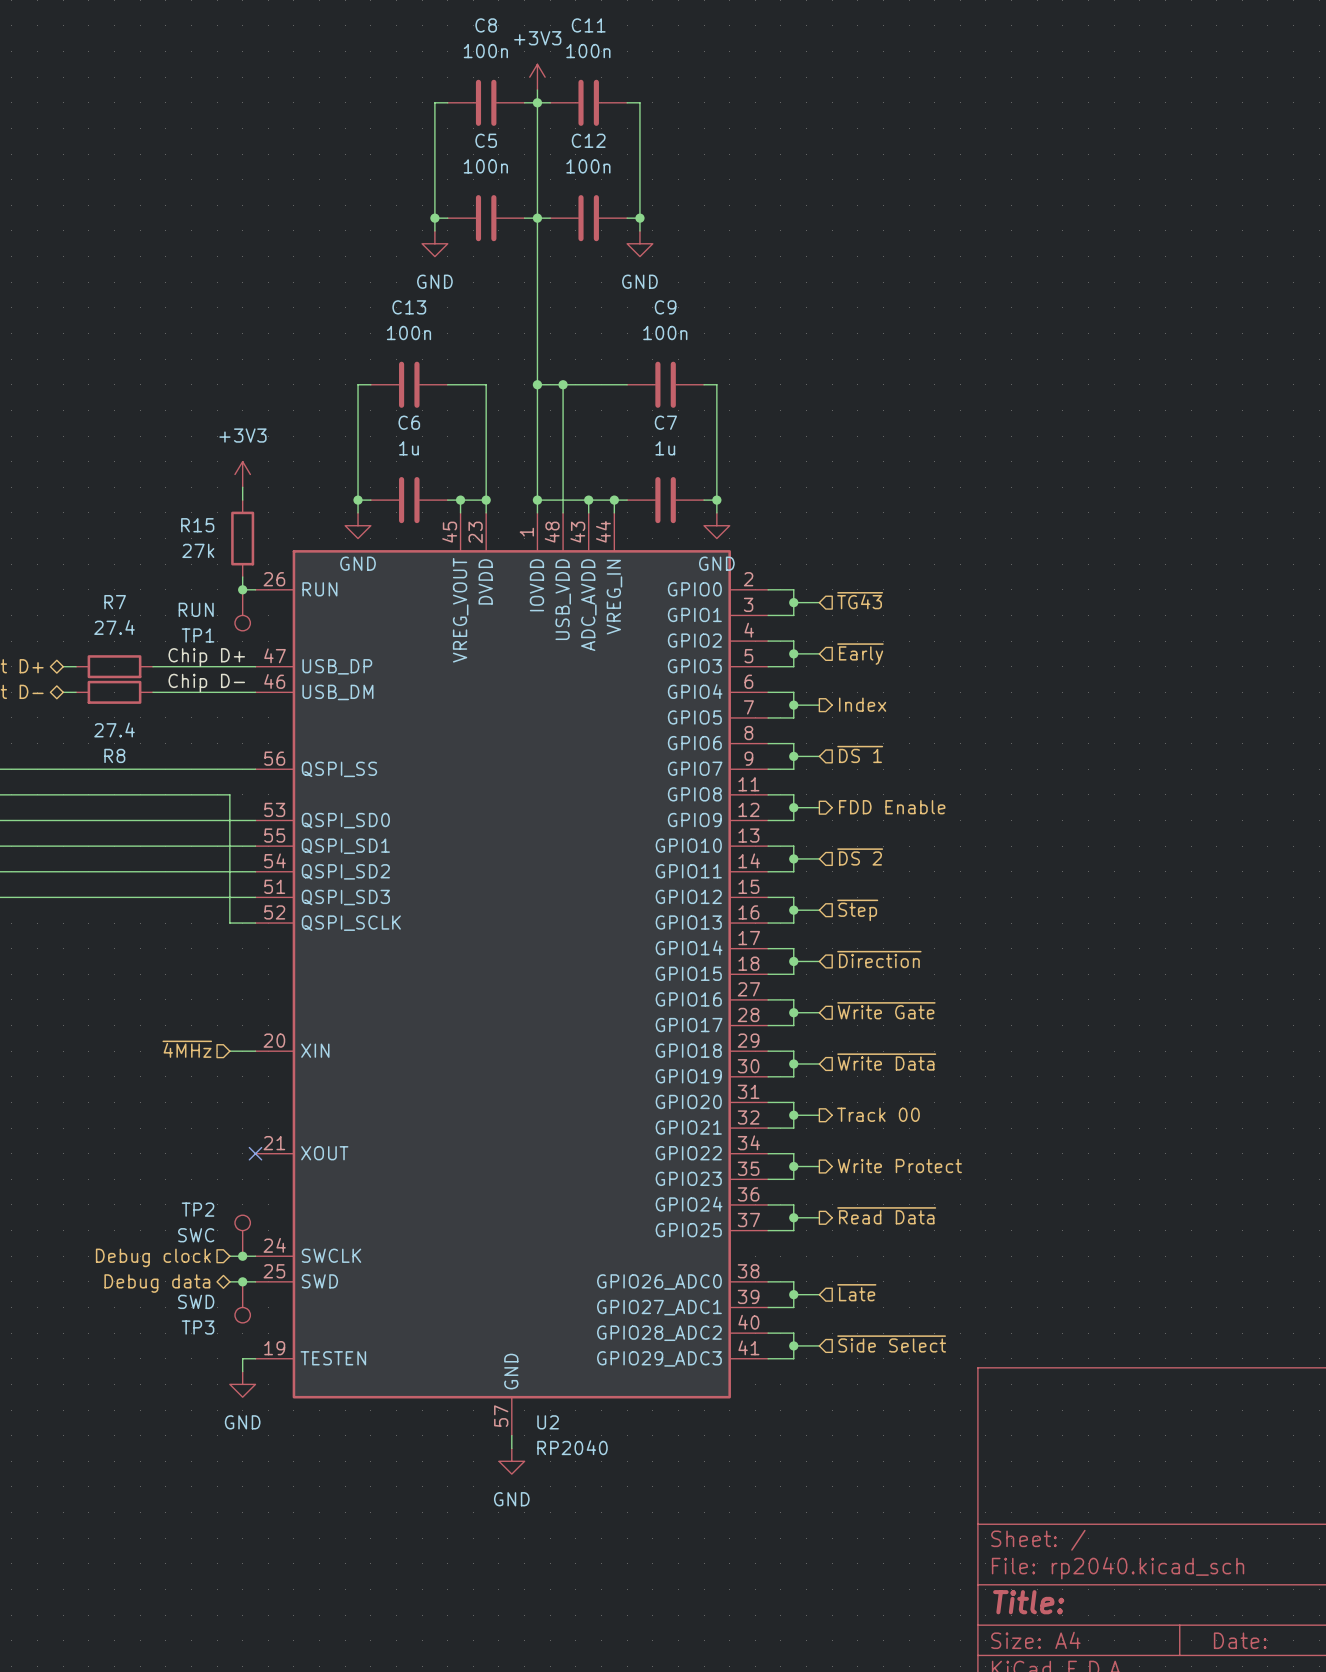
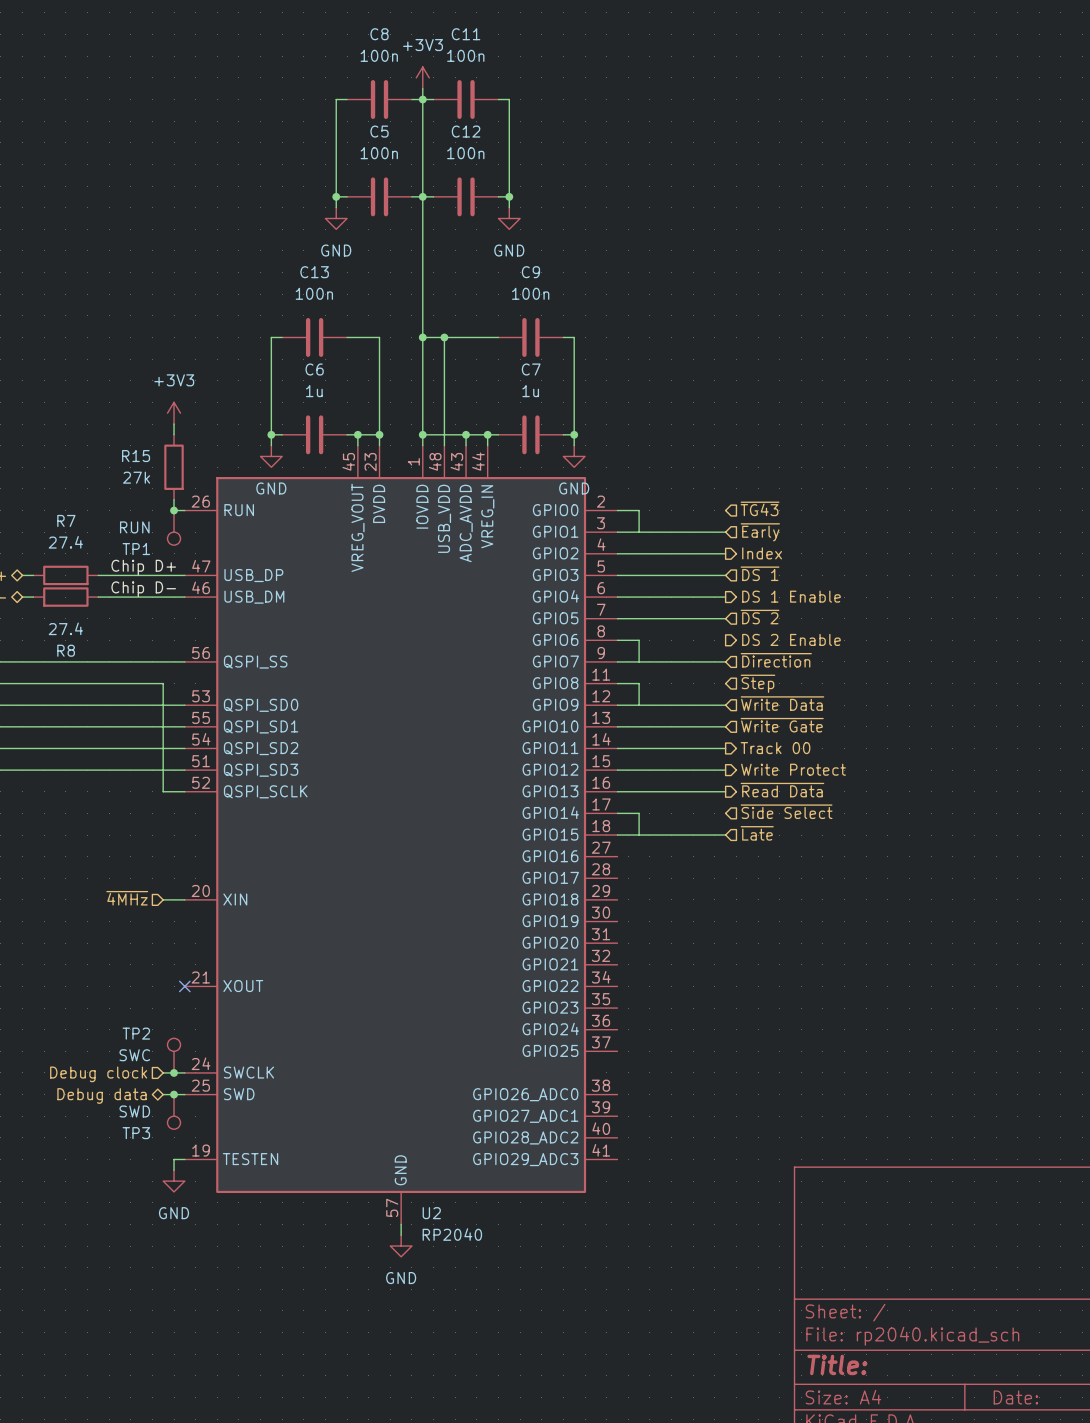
hierarchical label position: ~{TG43} (860, 600) -> ~{TG43} (760, 508)
wire: (793, 602) (819, 602) -> none
junction: (793, 602) -> none
wire: none -> (639, 532) (725, 532)
wire: (793, 641) (793, 666) -> (639, 553) (725, 553)
wire: (793, 653) (819, 653) -> none
junction: (793, 653) -> none
hierarchical label position: ~{Early} (860, 654) -> ~{Early} (760, 532)
wire: none -> (639, 575) (725, 575)
hierarchical label: none -> DS 1 Enable (791, 596)
wire: (793, 692) (793, 717) -> (639, 597) (725, 597)
hierarchical label position: Index (862, 704) -> Index (762, 553)
wire: (793, 705) (819, 705) -> none
junction: (793, 705) -> none
wire: none -> (639, 618) (725, 618)
hierarchical label: none -> DS 2 Enable (791, 639)
hierarchical label position: ~{DS 1} (860, 754) -> ~{DS 1} (760, 573)
wire: (793, 756) (819, 756) -> none
junction: (793, 756) -> none
wire: none -> (639, 661) (725, 661)
wire: (793, 807) (819, 807) -> none
junction: (793, 807) -> none
hierarchical label: FDD Enable (892, 807) -> none
hierarchical label: none -> ~{Write Data} (782, 703)
wire: none -> (639, 705) (725, 705)
wire: (793, 846) (793, 871) -> (639, 726) (725, 726)
hierarchical label position: ~{DS 2} (860, 856) -> ~{DS 2} (760, 617)
wire: (793, 858) (819, 858) -> none
junction: (793, 858) -> none
wire: none -> (639, 748) (725, 748)
hierarchical label: none -> Track 00 (775, 748)
hierarchical label: none -> Write Protect (793, 769)
wire: (793, 897) (793, 923) -> (639, 770) (725, 770)
wire: (793, 910) (819, 910) -> none
junction: (793, 910) -> none
hierarchical label position: ~{Step} (857, 910) -> ~{Step} (757, 683)
hierarchical label: none -> ~{Read Data} (782, 790)
wire: none -> (639, 791) (725, 791)
hierarchical label: none -> ~{Side Select} (786, 811)
hierarchical label position: ~{Direction} (879, 959) -> ~{Direction} (776, 660)
wire: (793, 961) (819, 961) -> none
junction: (793, 961) -> none
hierarchical label: none -> ~{Late} (757, 833)
wire: none -> (639, 835) (725, 835)
wire: (768, 999) (793, 999) (793, 1025) (768, 1025) -> none
hierarchical label position: ~{Write Gate} (886, 1010) -> ~{Write Gate} (782, 725)
wire: (793, 1012) (819, 1012) -> none
junction: (793, 1012) -> none
wire: (768, 1051) (793, 1051) (793, 1076) (768, 1076) -> none
hierarchical label: ~{Write Data} (886, 1062) -> none
wire: (793, 1063) (819, 1063) -> none
junction: (793, 1063) -> none
wire: (768, 1102) (793, 1102) (793, 1128) (768, 1128) -> none
hierarchical label: Track 00 (878, 1114) -> none
wire: (793, 1115) (819, 1115) -> none
junction: (793, 1115) -> none
wire: (768, 1153) (793, 1153) (793, 1179) (768, 1179) -> none
wire: (793, 1166) (819, 1166) -> none
junction: (793, 1166) -> none
hierarchical label: Write Protect (899, 1166) -> none
wire: (768, 1204) (793, 1204) (793, 1230) (768, 1230) -> none
hierarchical label: ~{Read Data} (886, 1215) -> none
wire: (793, 1217) (819, 1217) -> none
junction: (793, 1217) -> none
wire: (768, 1281) (793, 1281) (793, 1307) (768, 1307) -> none
hierarchical label: ~{Late} (856, 1292) -> none
wire: (793, 1294) (819, 1294) -> none
junction: (793, 1294) -> none
wire: (768, 1333) (793, 1333) (793, 1358) (768, 1358) -> none
hierarchical label: ~{Side Select} (891, 1343) -> none
wire: (793, 1345) (819, 1345) -> none
junction: (793, 1345) -> none

